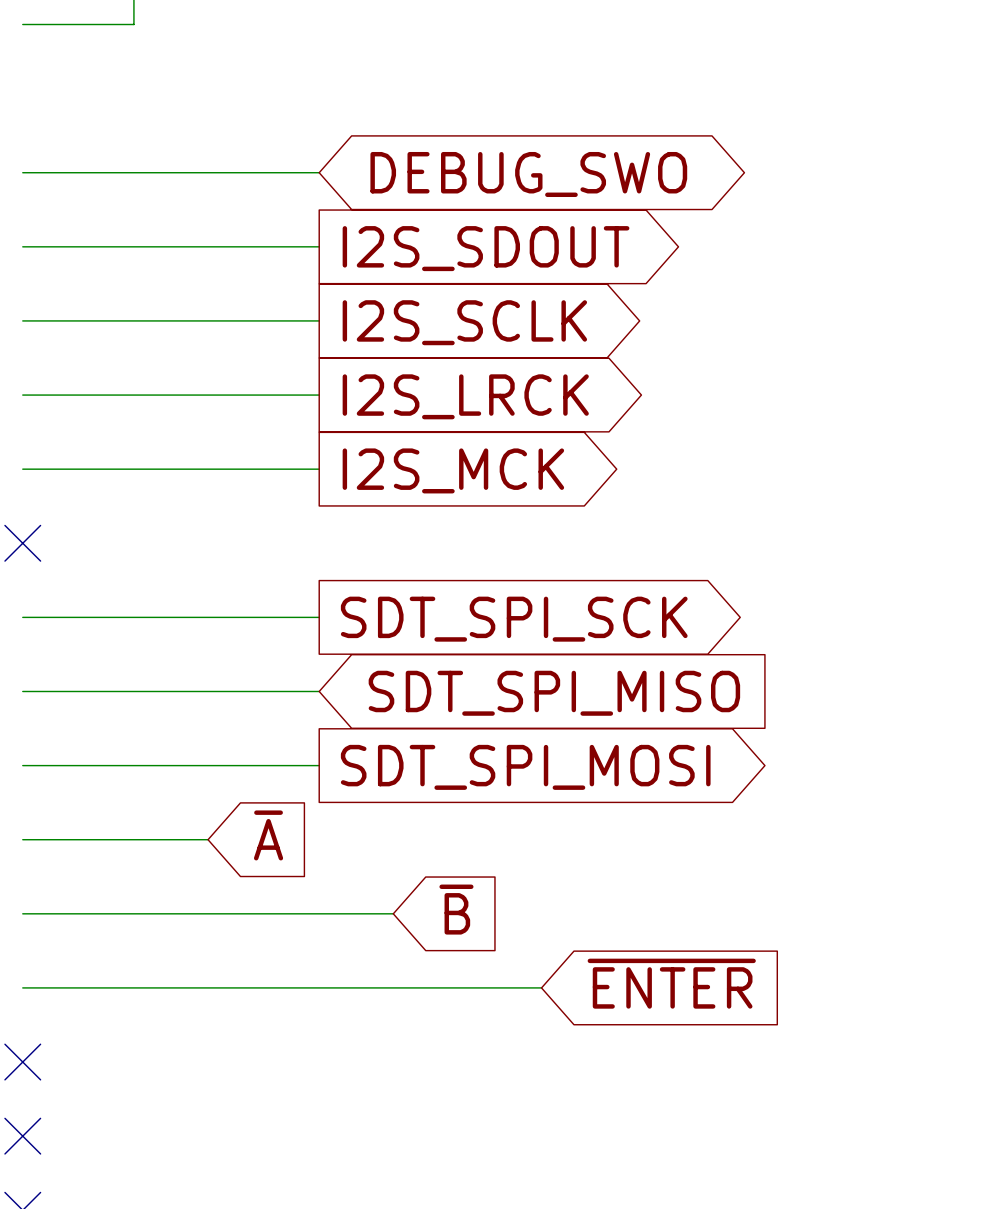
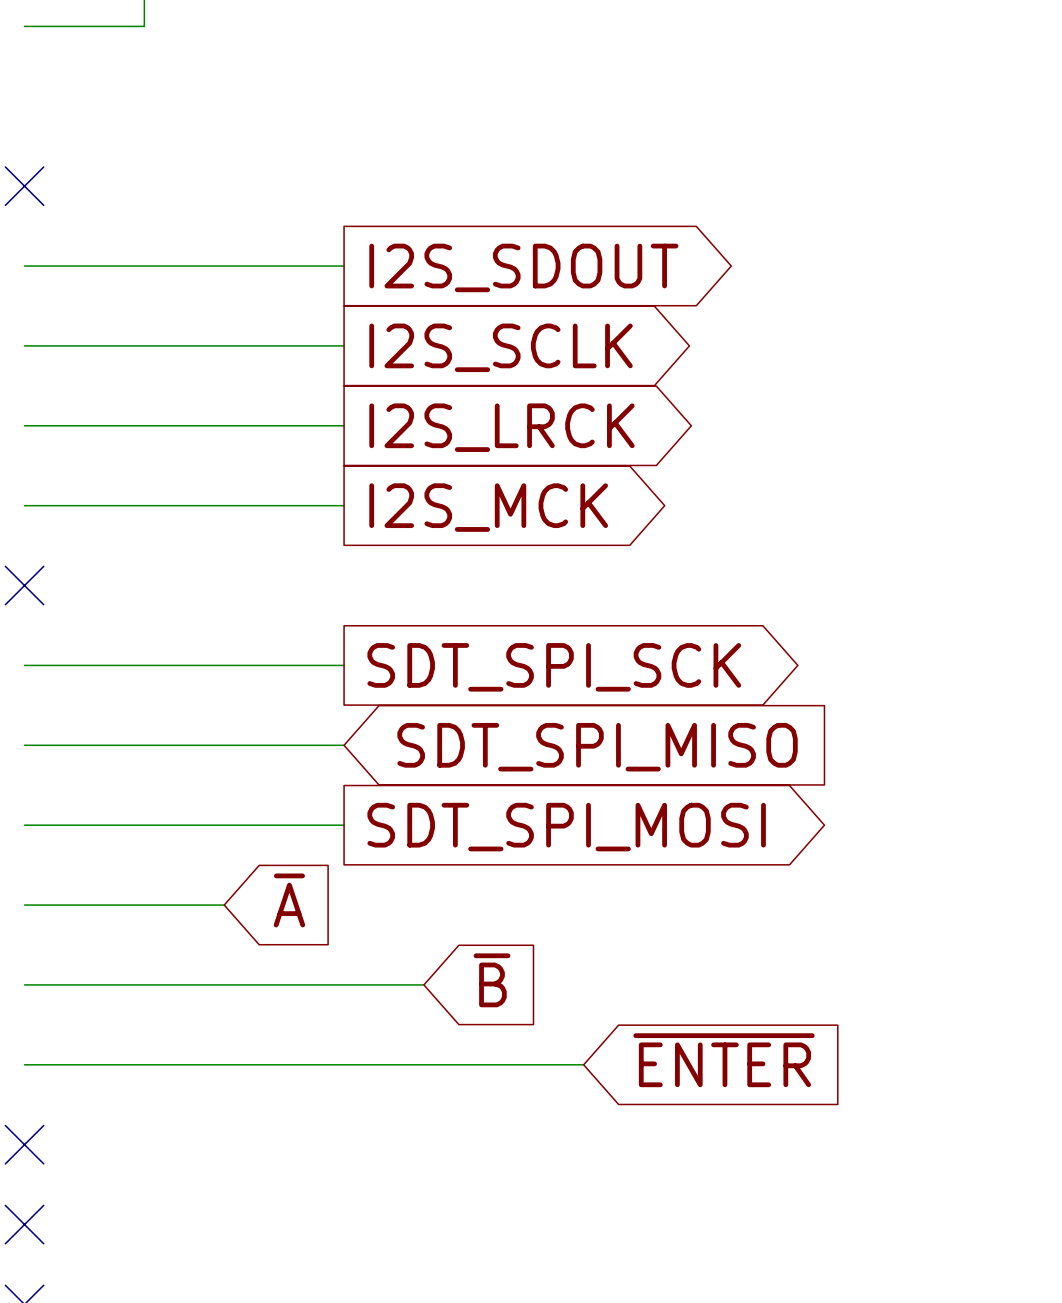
wire: (22, 172) (319, 172) -> none
no-connect mark: none -> (24, 186)
global label: DEBUG_SWO (528, 174) -> none

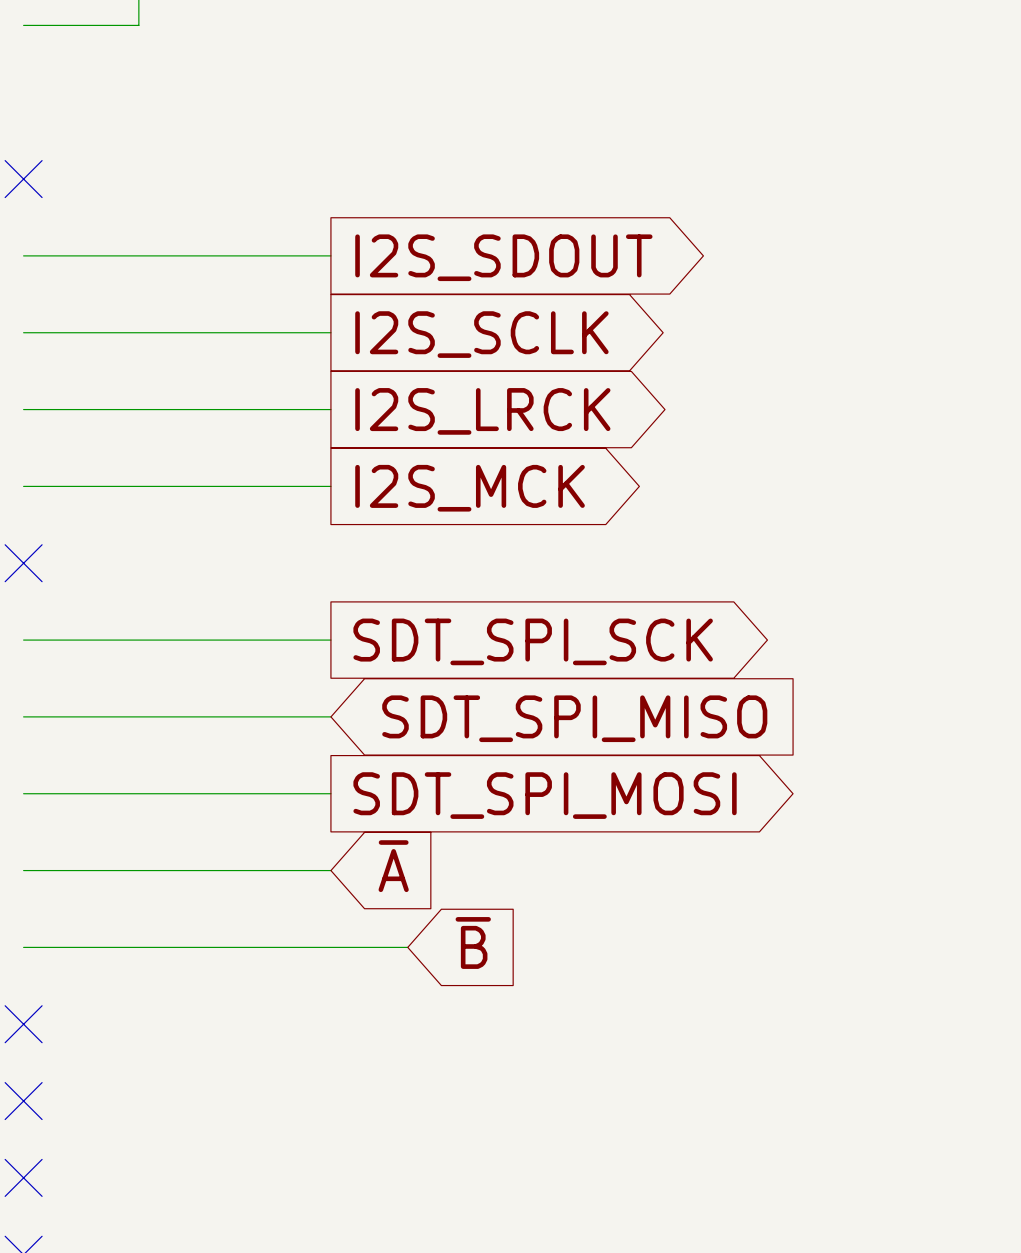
global label position: ~{A} (289, 900) -> ~{A} (393, 866)
wire: none -> (215, 870) (330, 870)
global label: ~{ENTER} (724, 1060) -> none
wire: (24, 1064) (583, 1064) -> none
no-connect mark: none -> (23, 1024)

